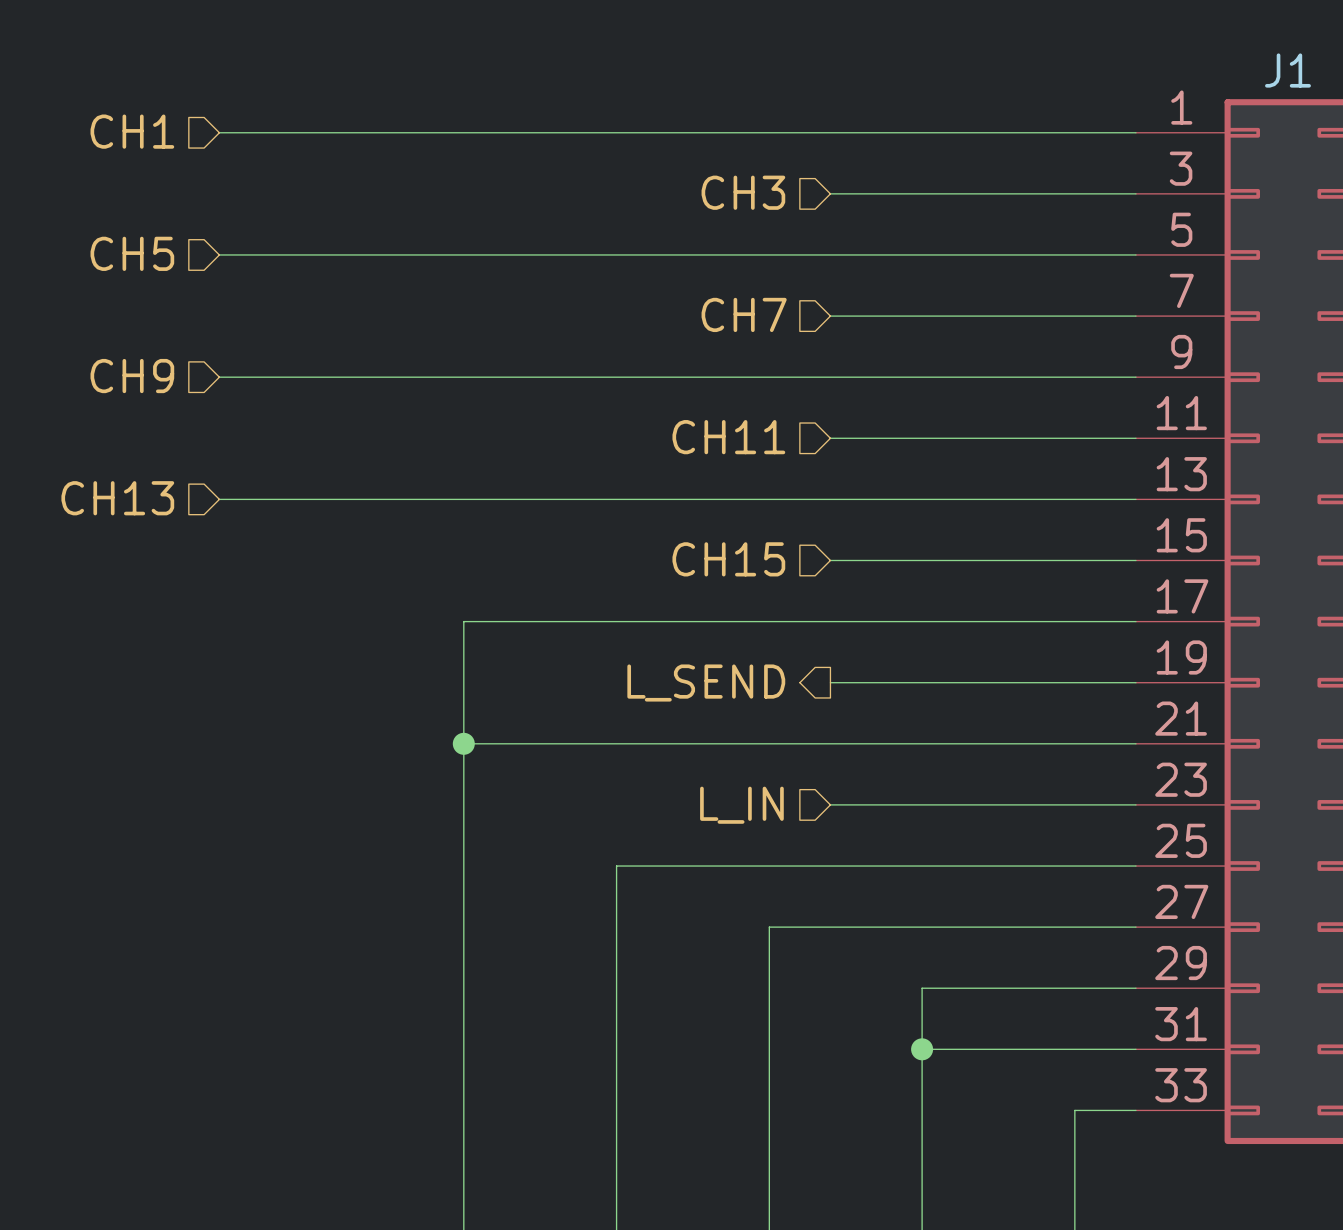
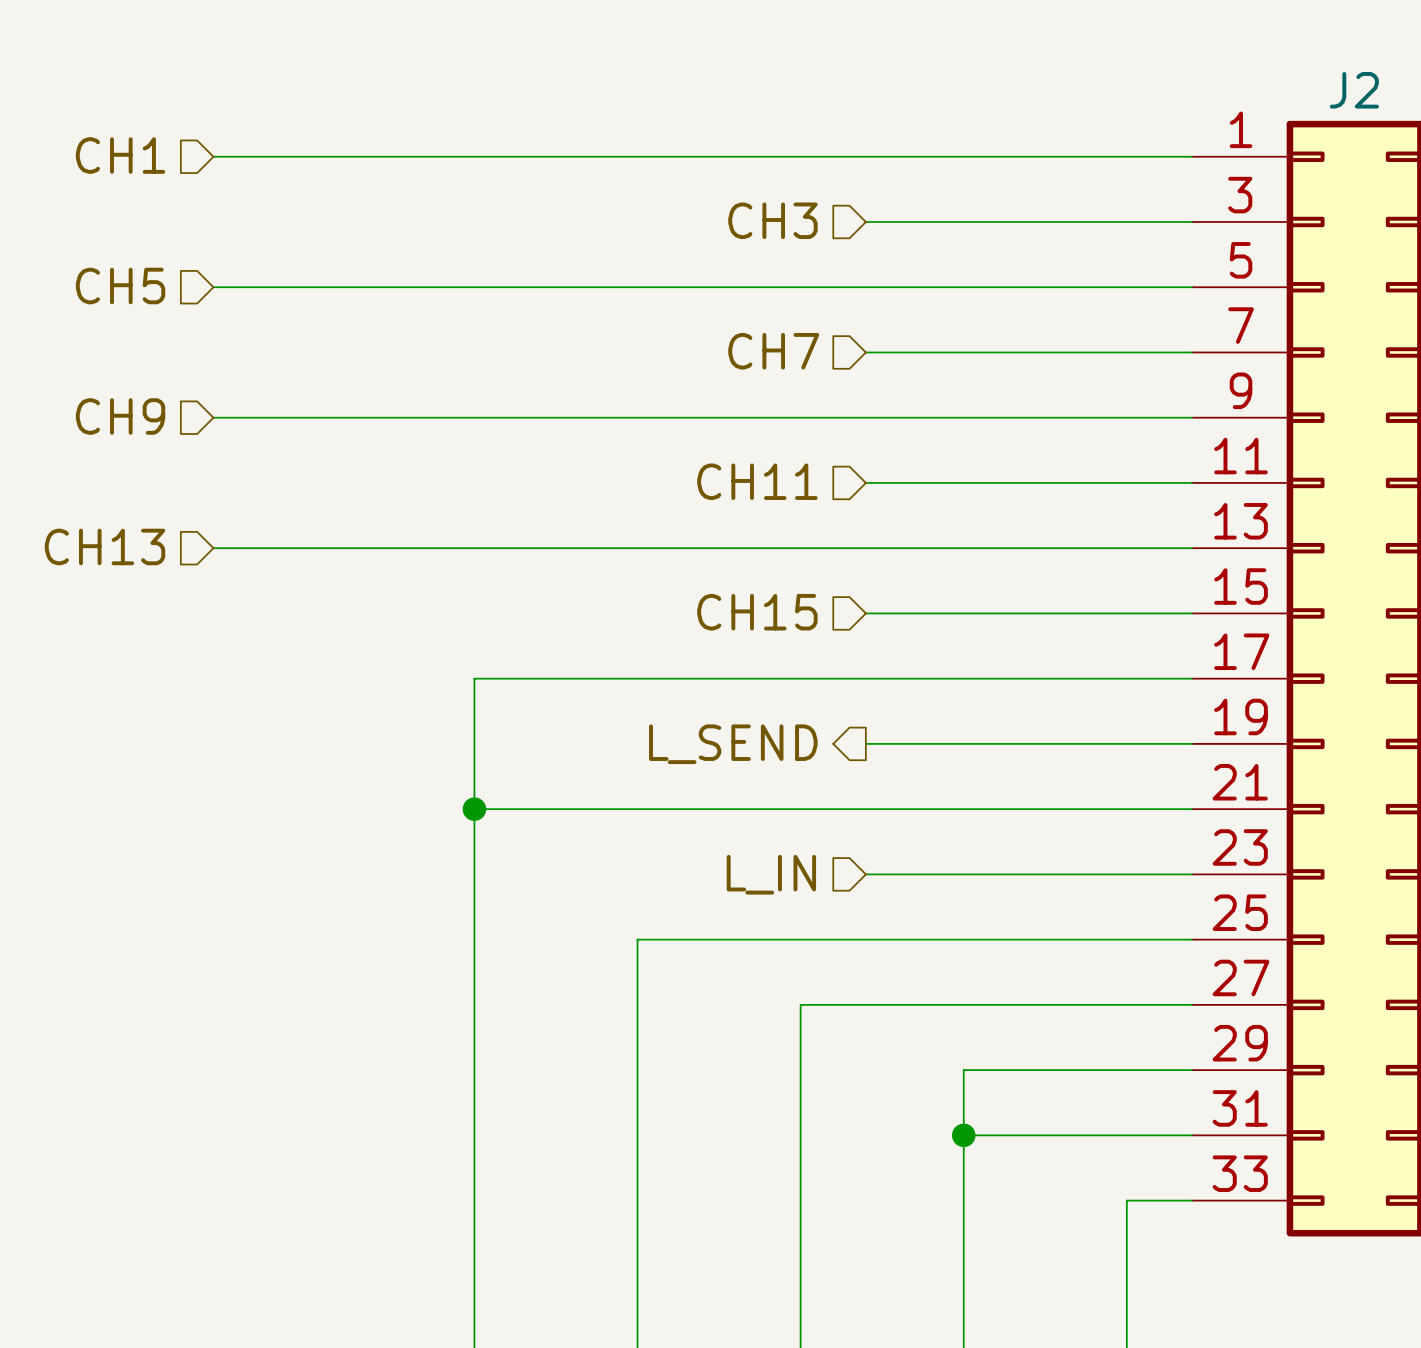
J1 name: J1 (1287, 70) -> J2 (1354, 90)

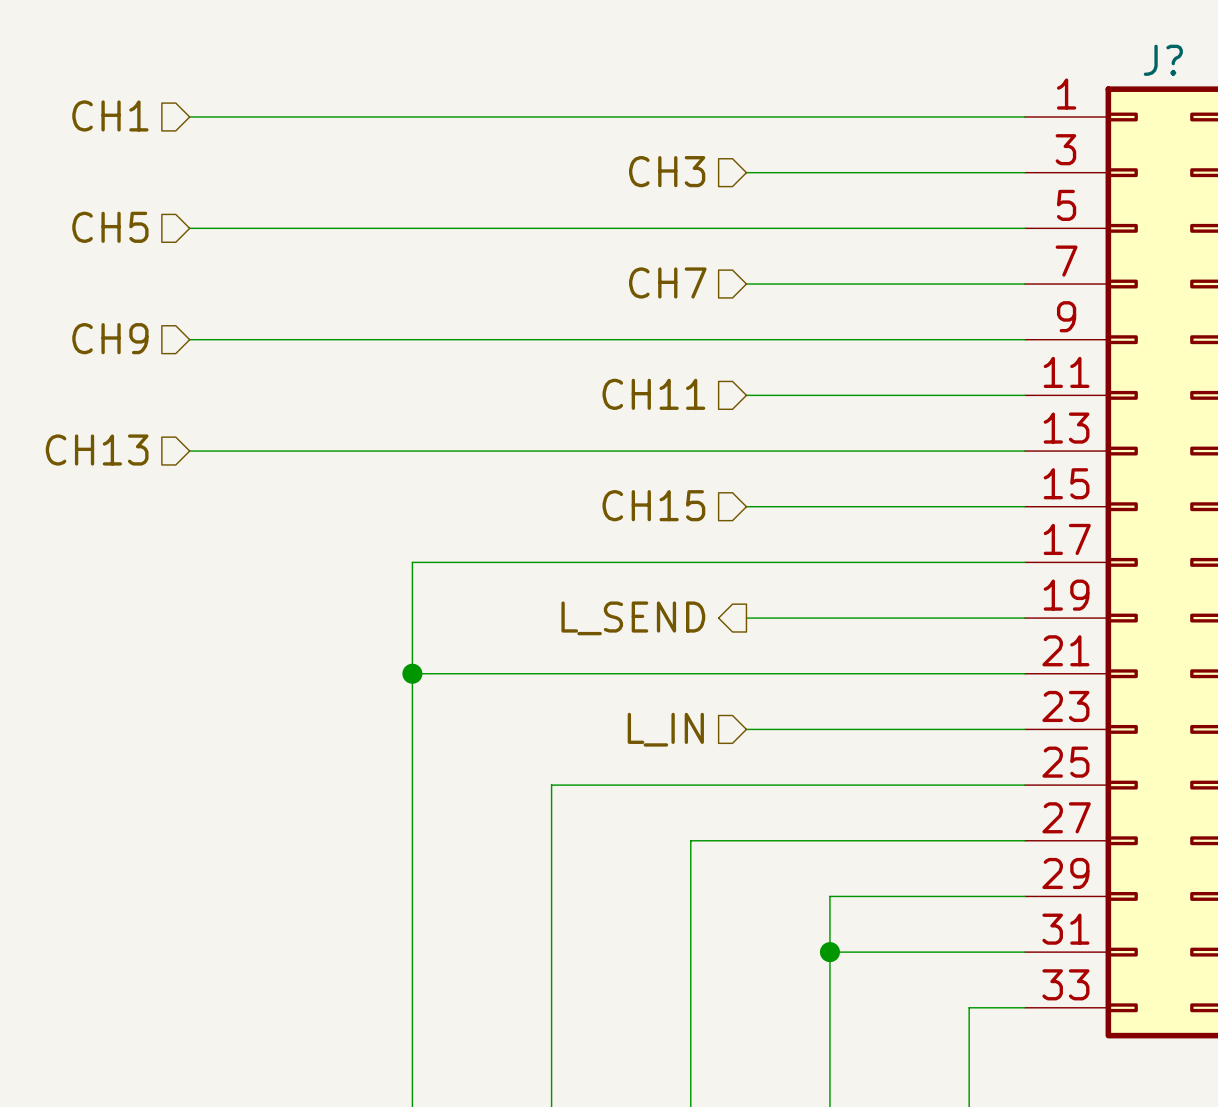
J2 name: J2 (1354, 90) -> J? (1163, 60)

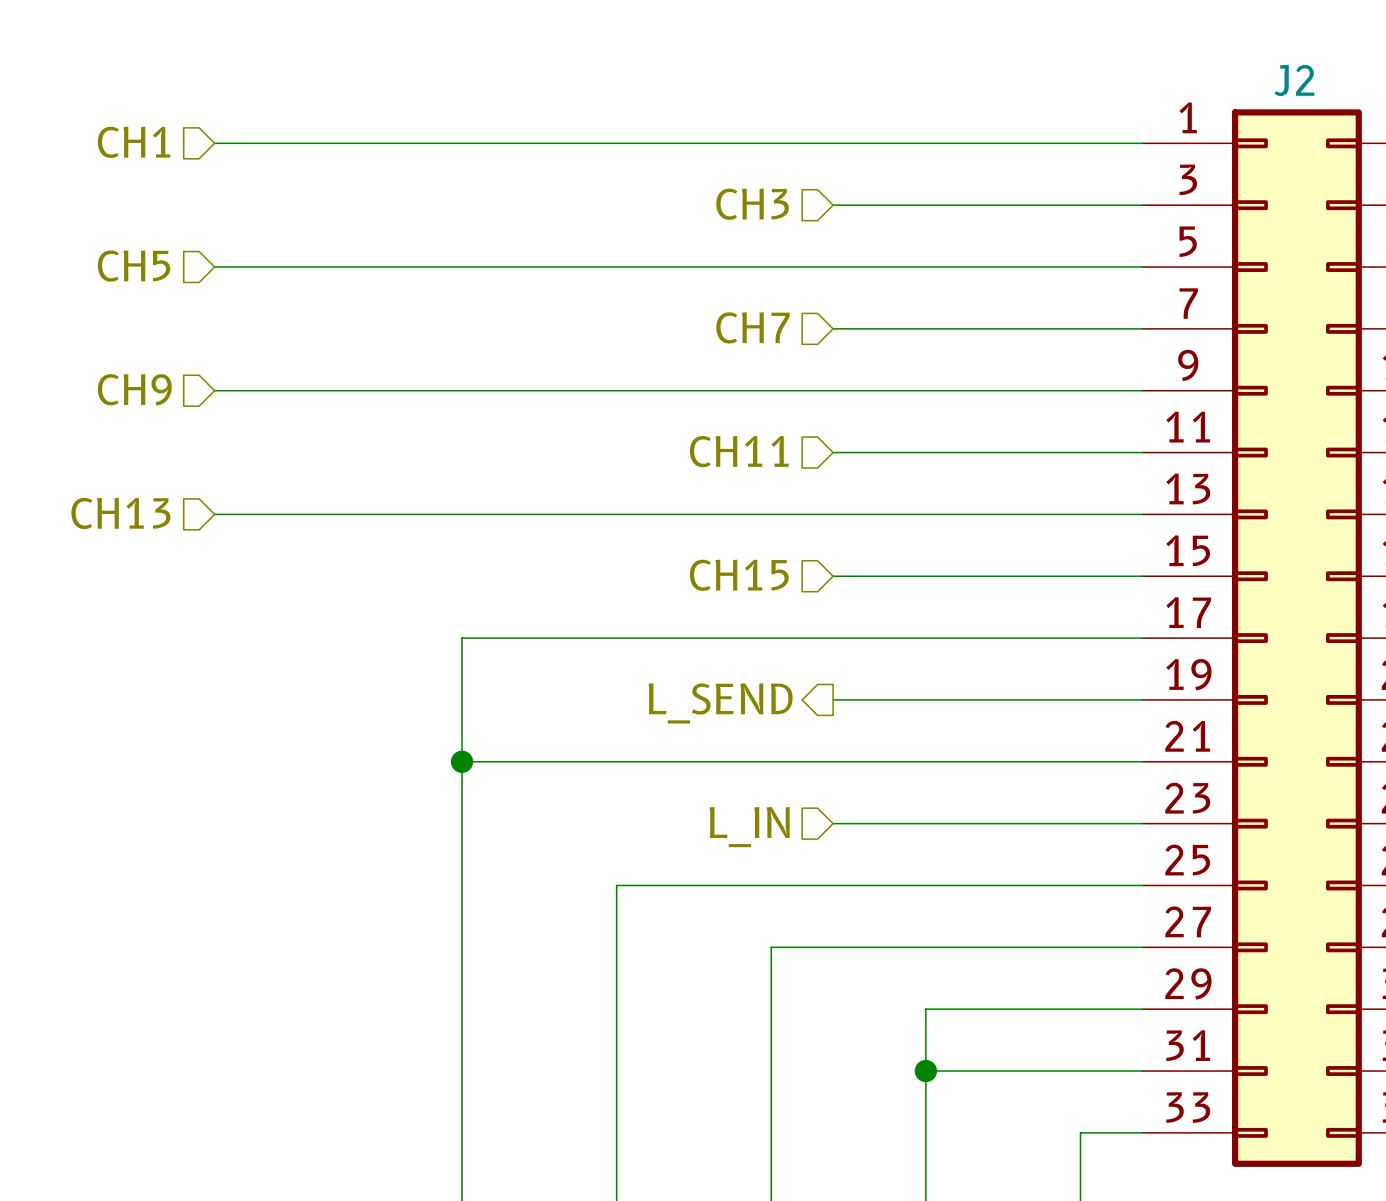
J? name: J? (1163, 60) -> J2 (1294, 80)

